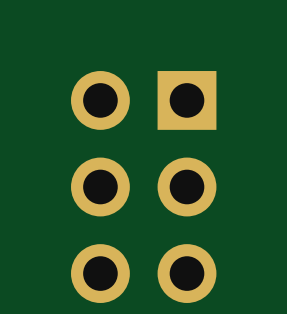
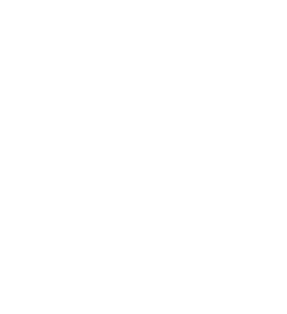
part: (143, 187) -> none

